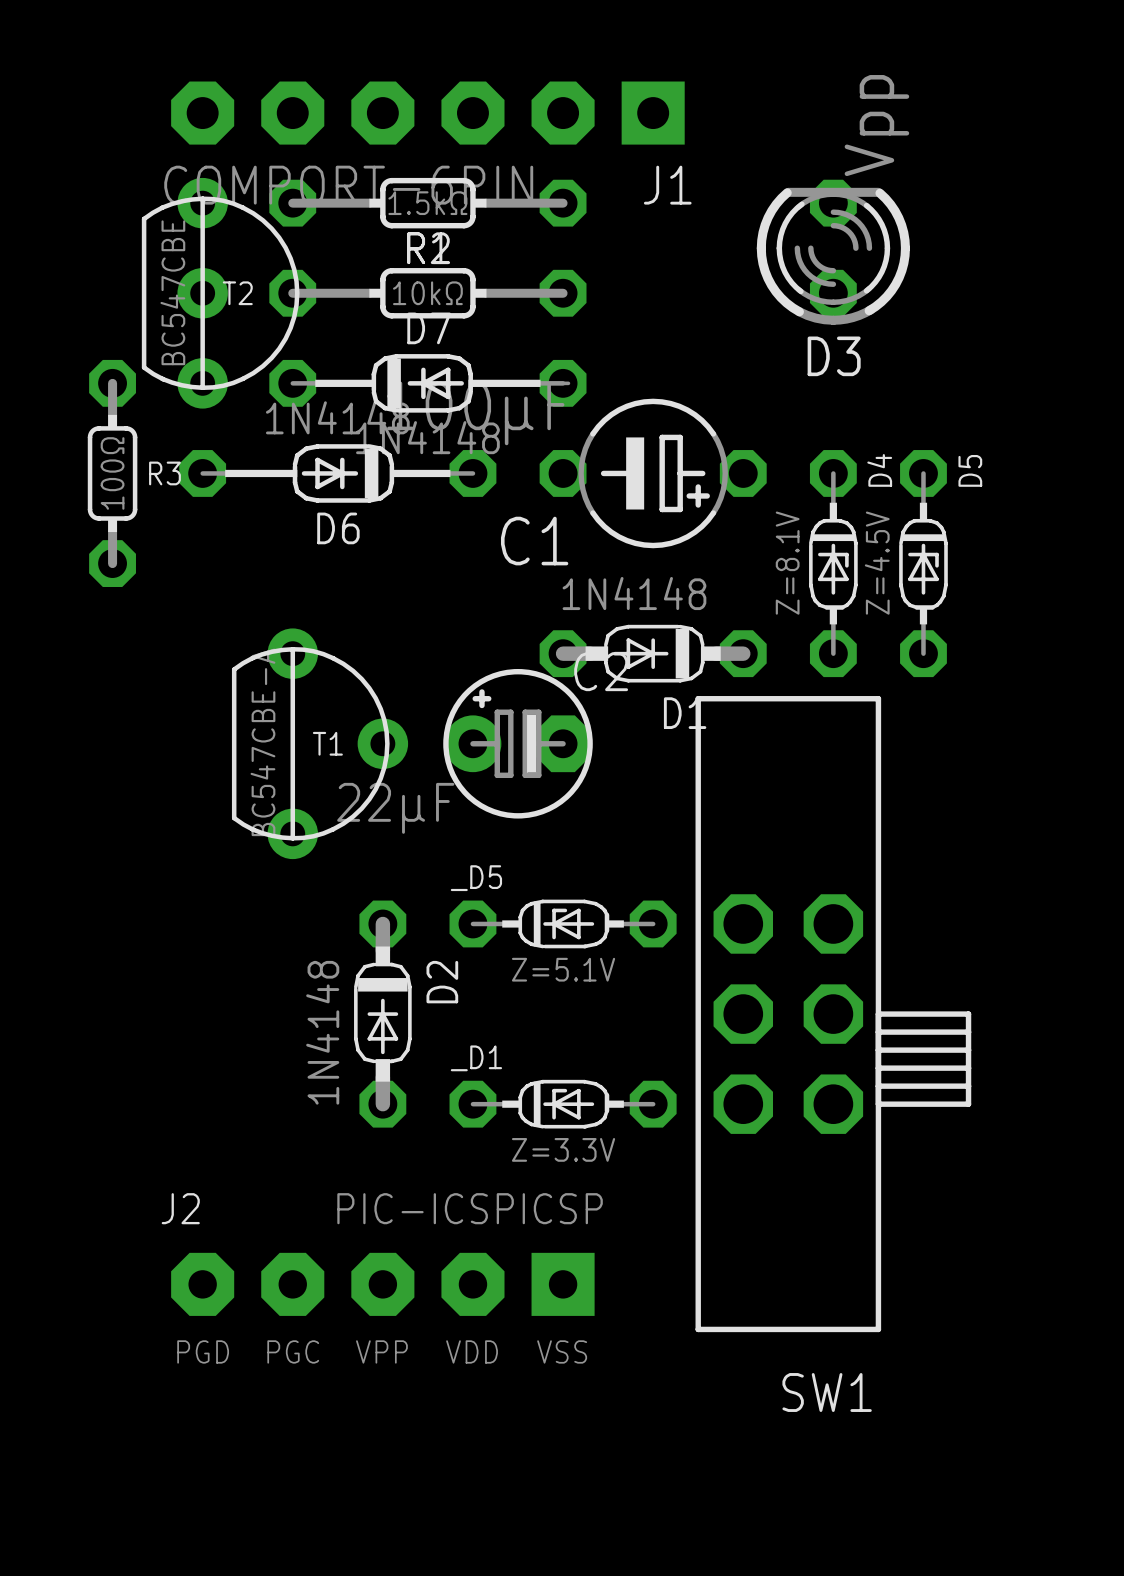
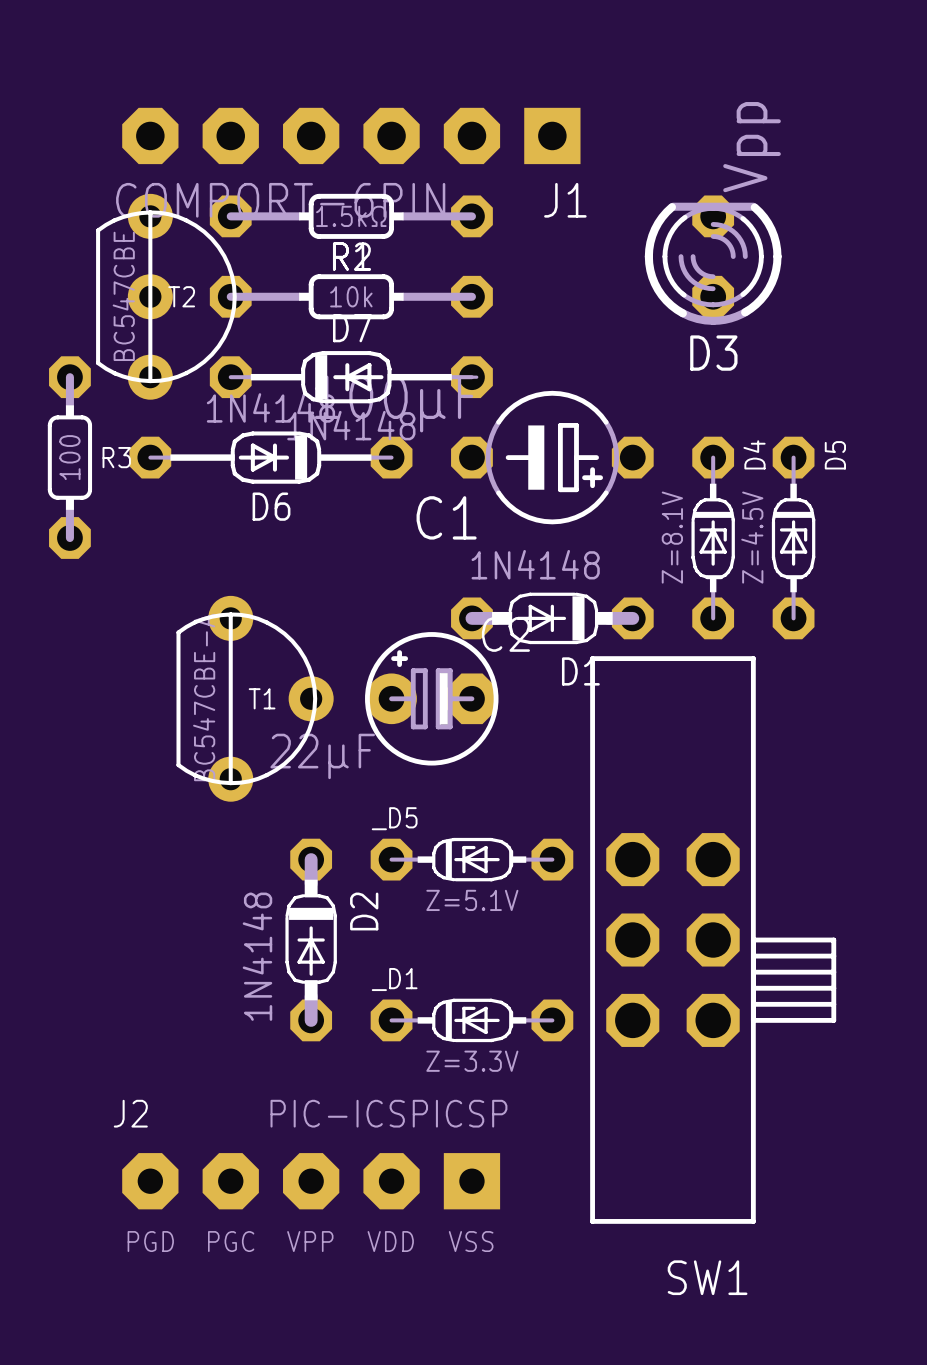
part value: 10kΩ (427, 293) -> 10k (351, 296)
R3 value: 100Ω (112, 473) -> 100 (69, 457)

